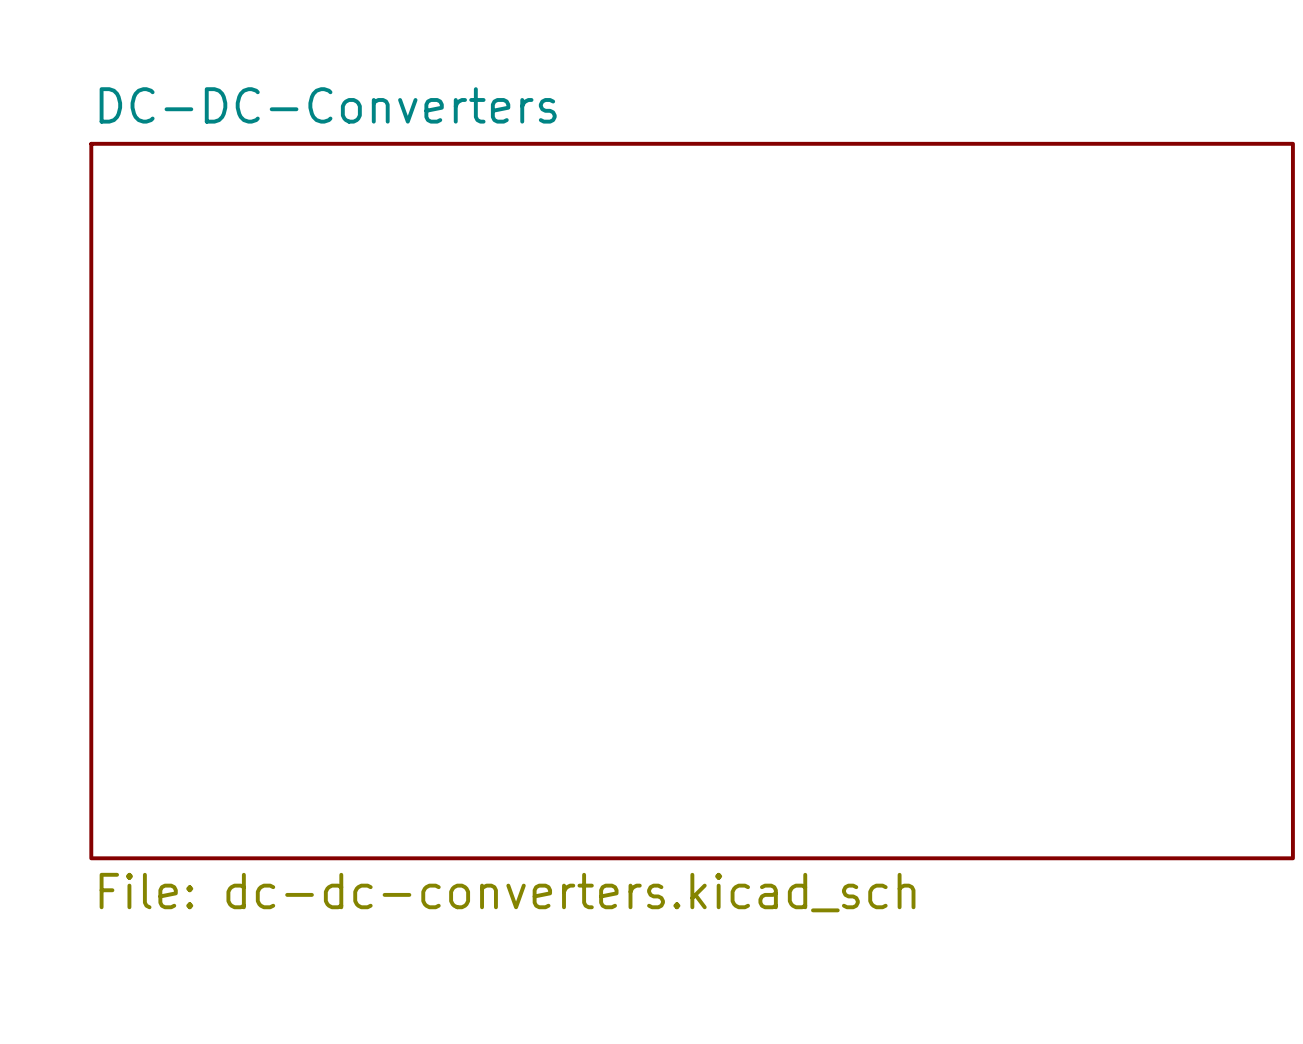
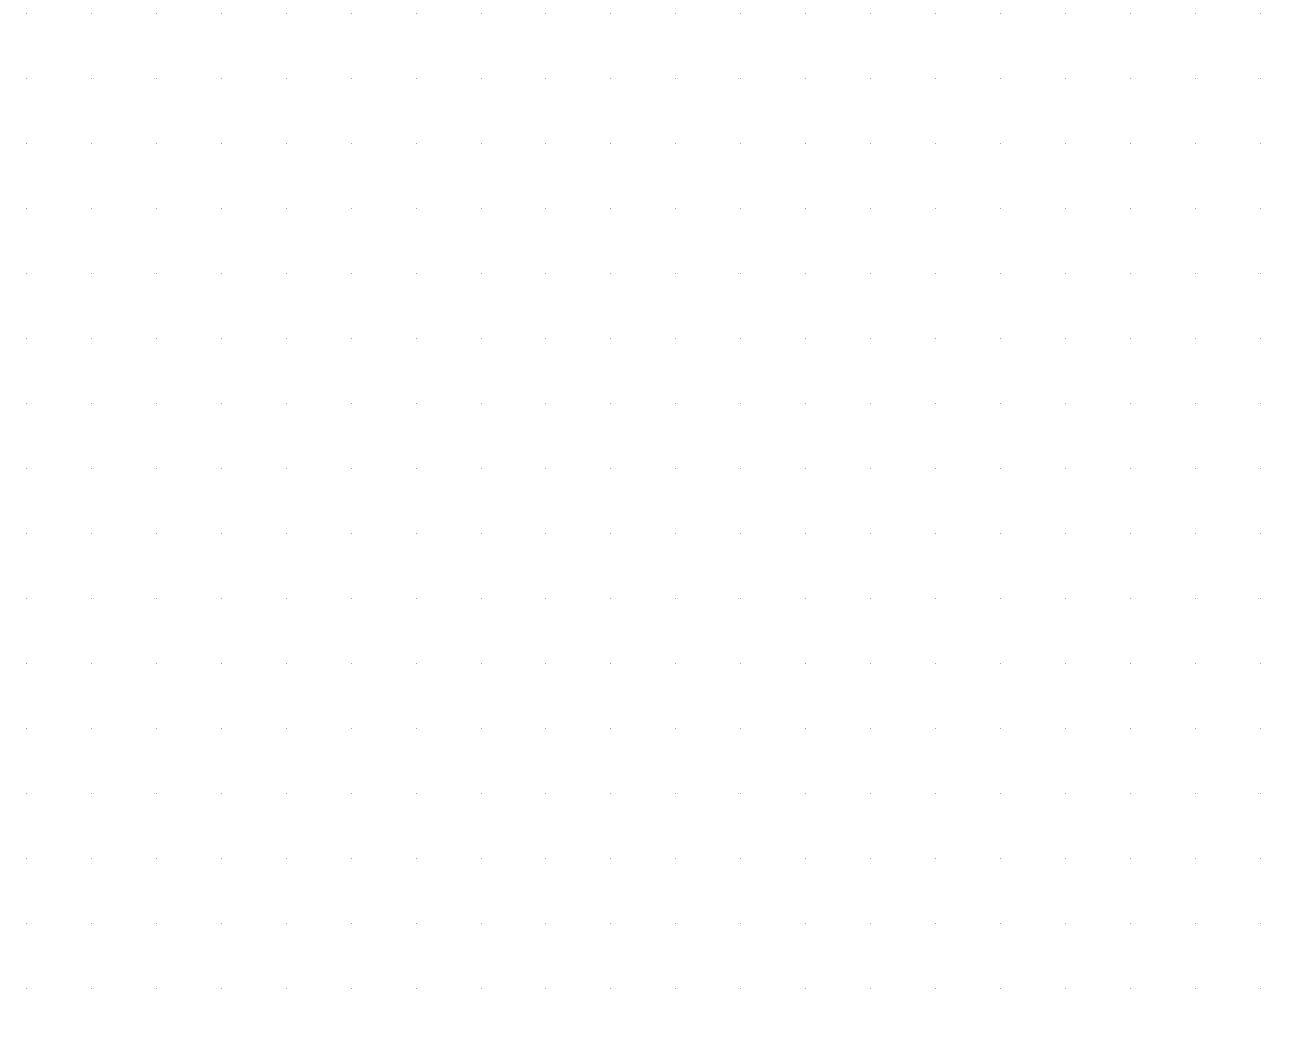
sheet DC-DC-Converters: File: dc-dc-converters.kicad_sch (692, 501) -> none

